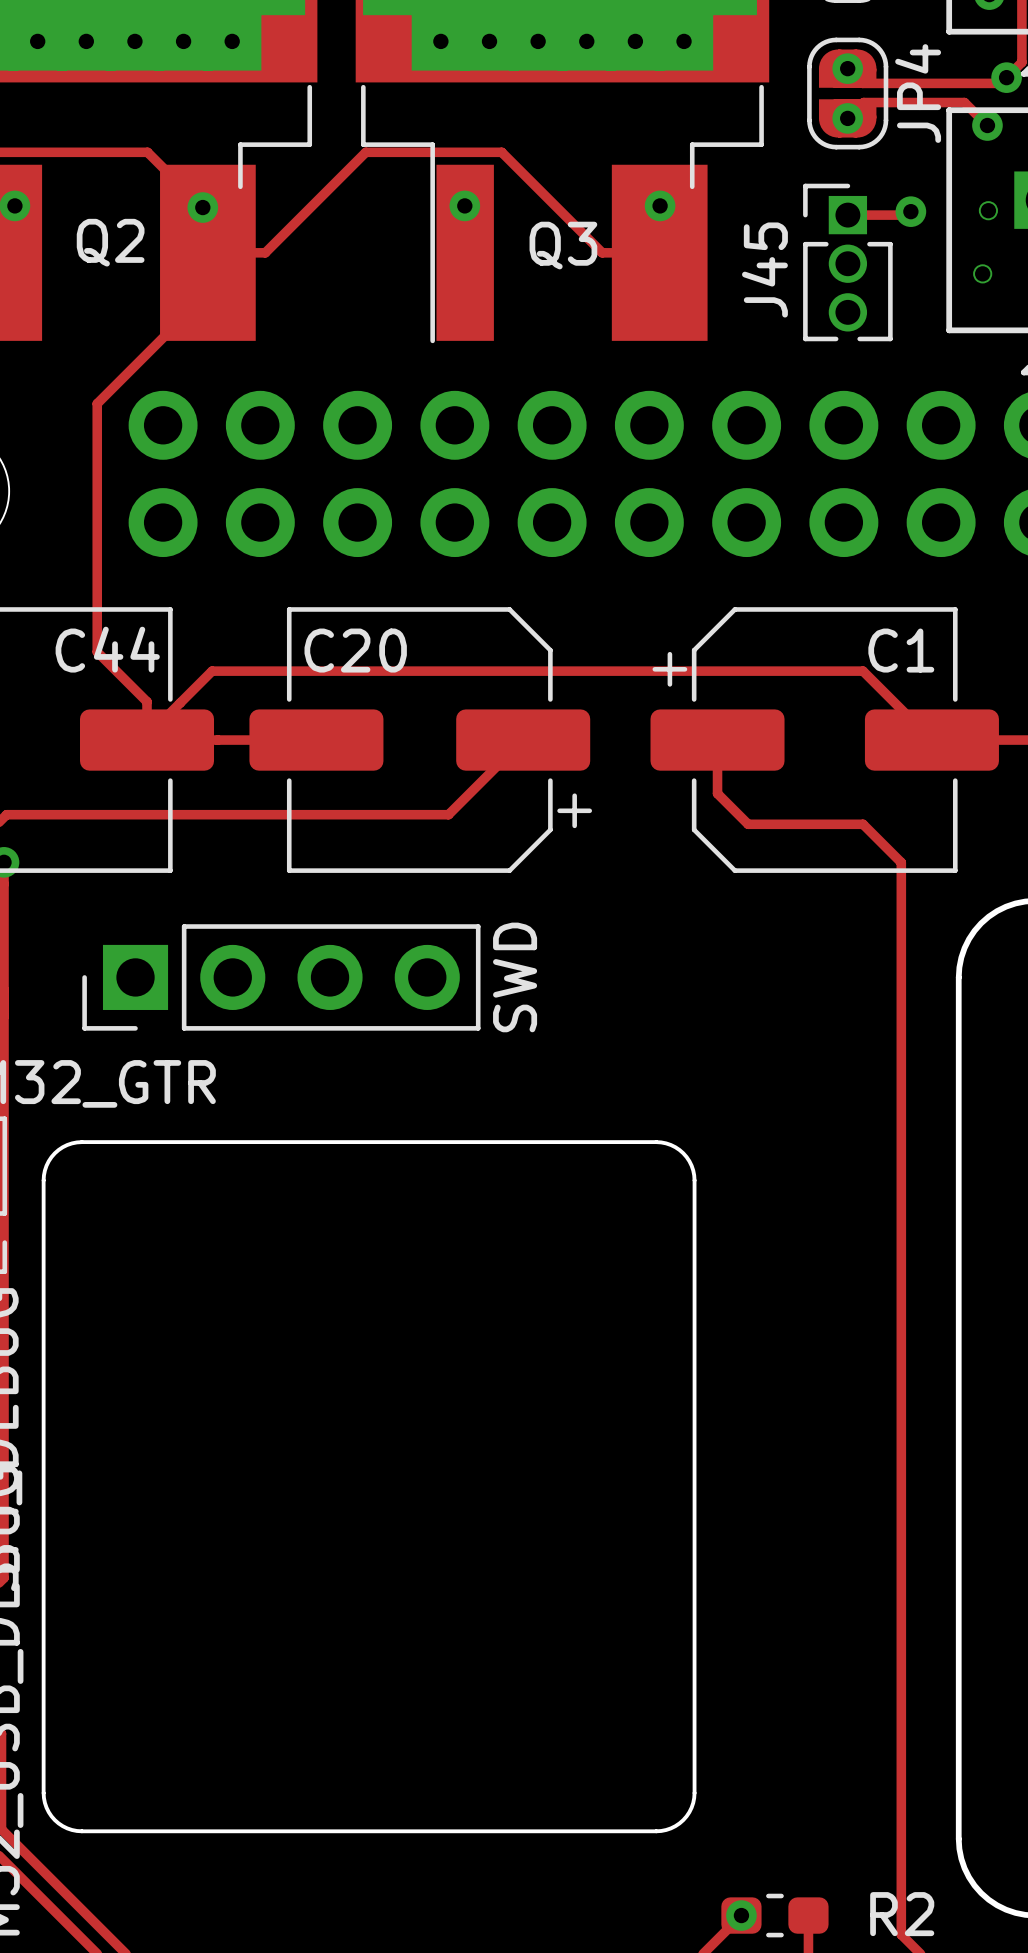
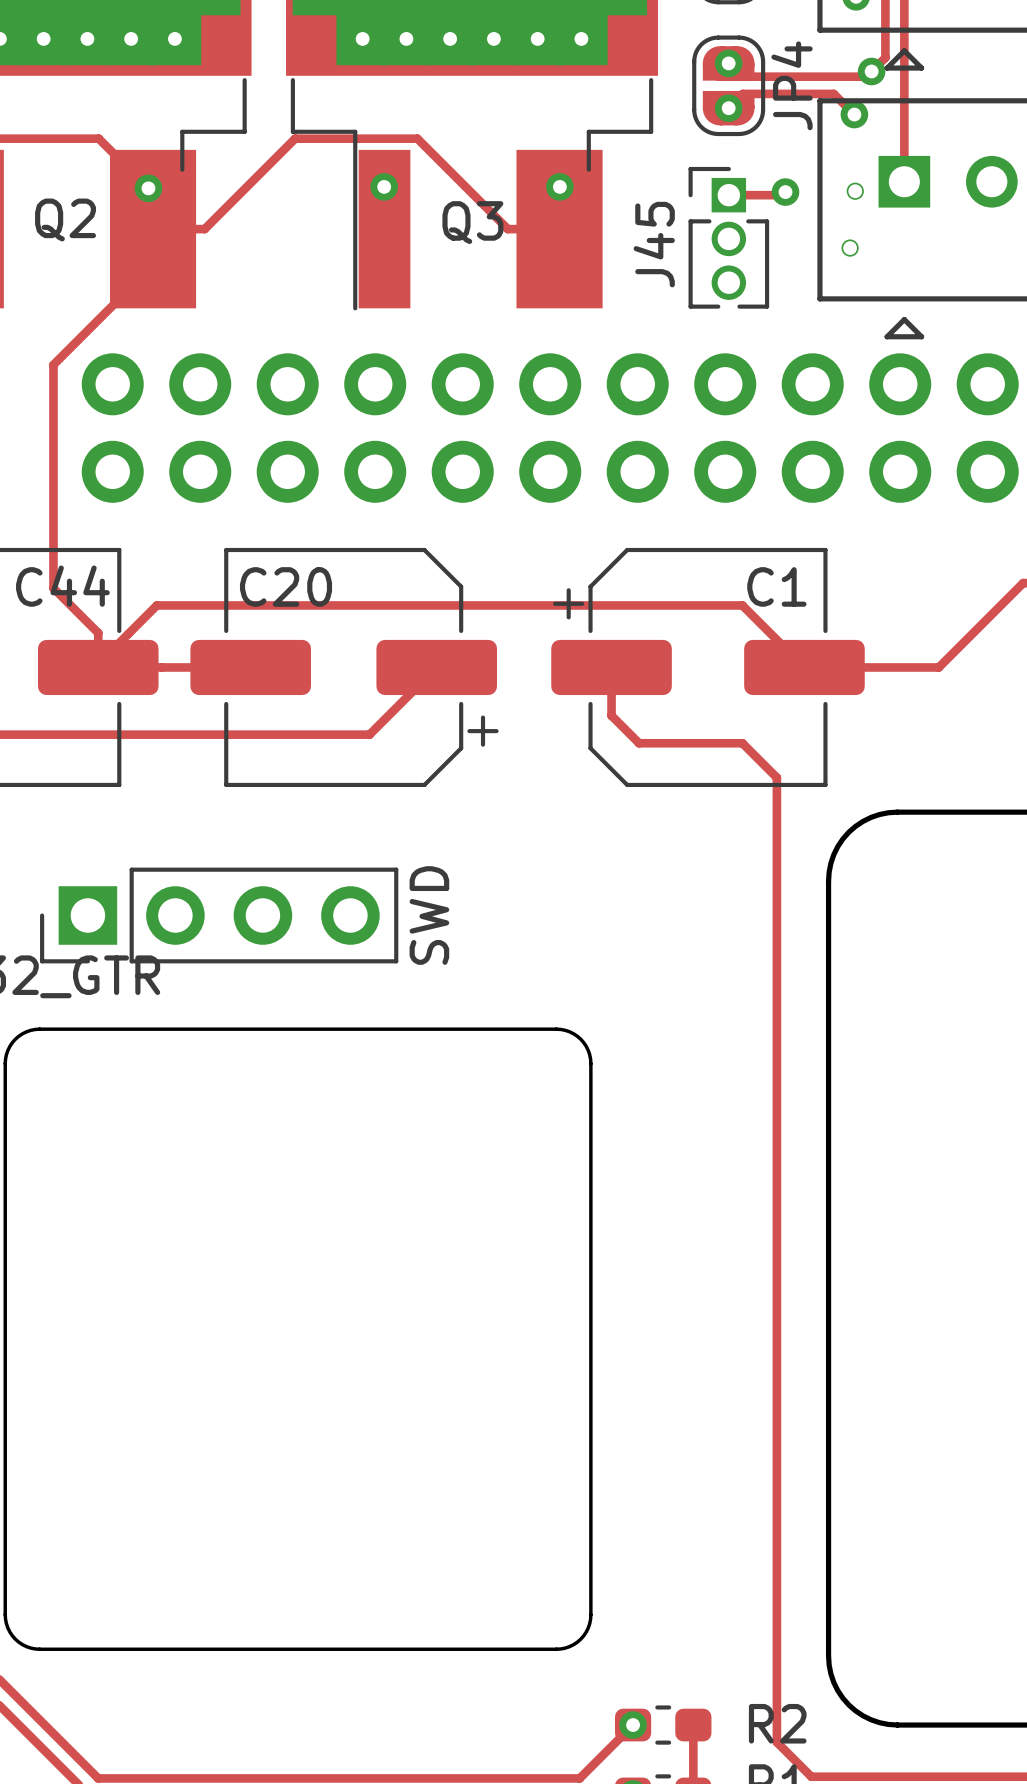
part position: (281, 977) -> (219, 915)

